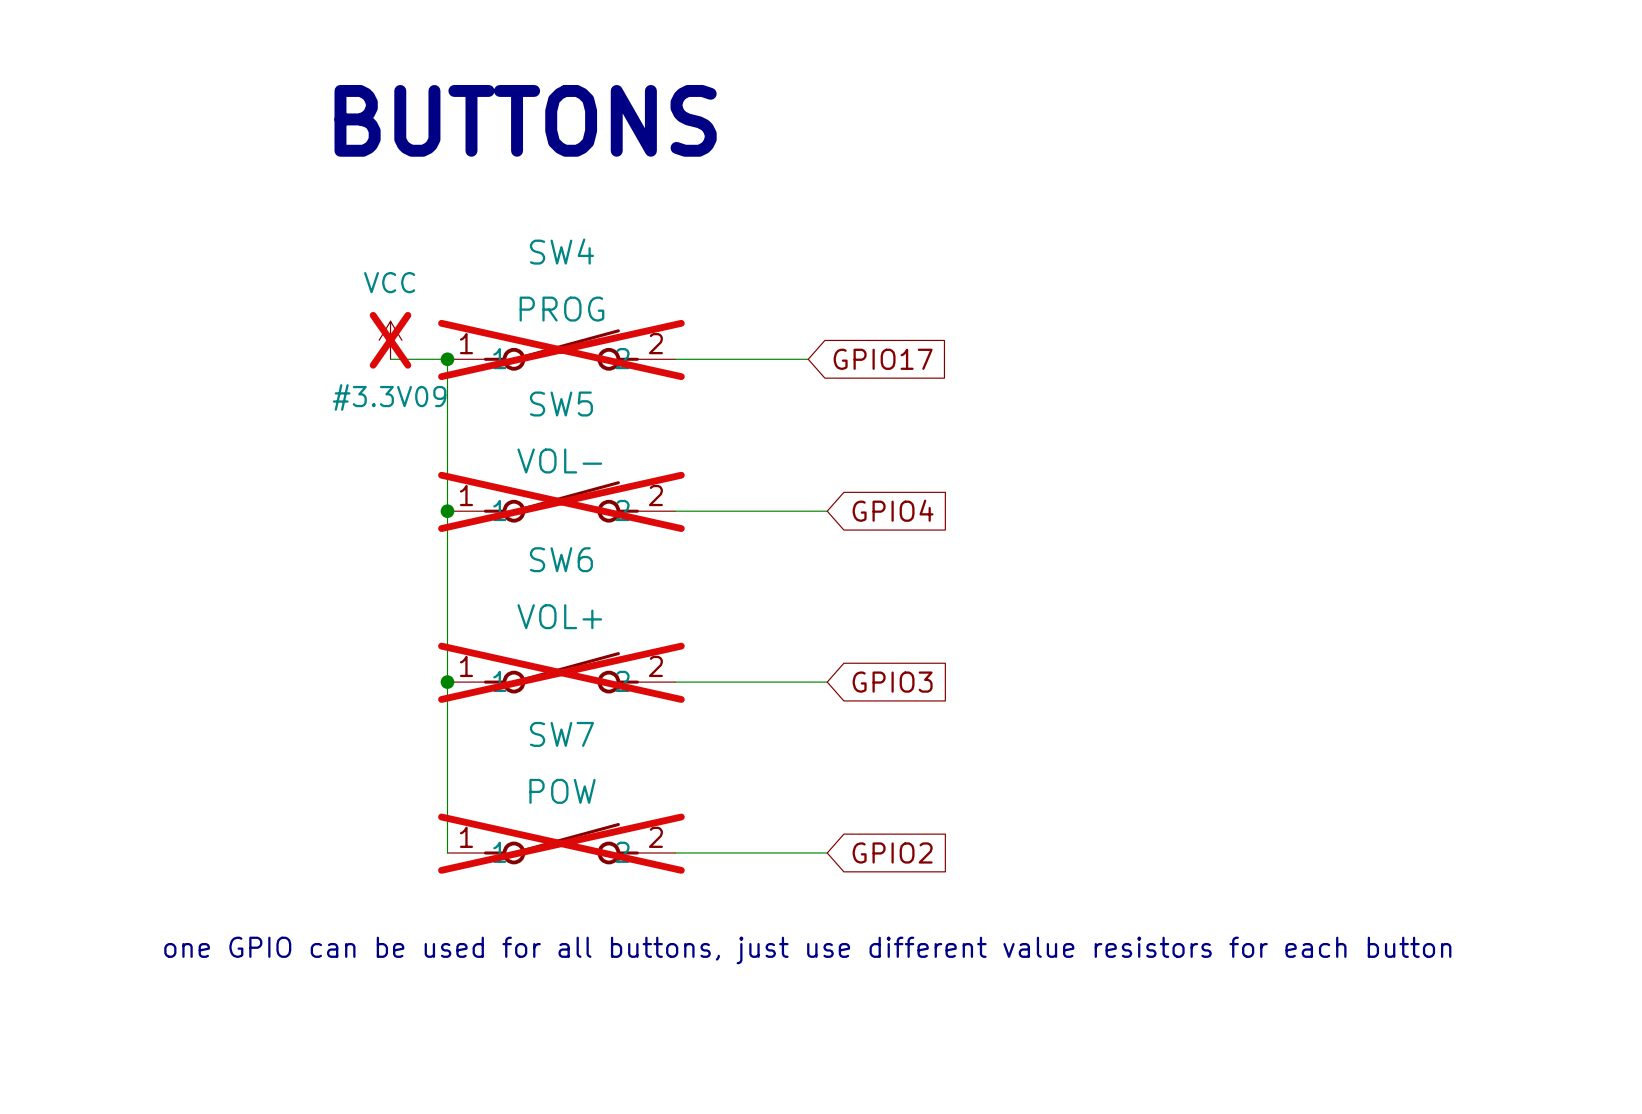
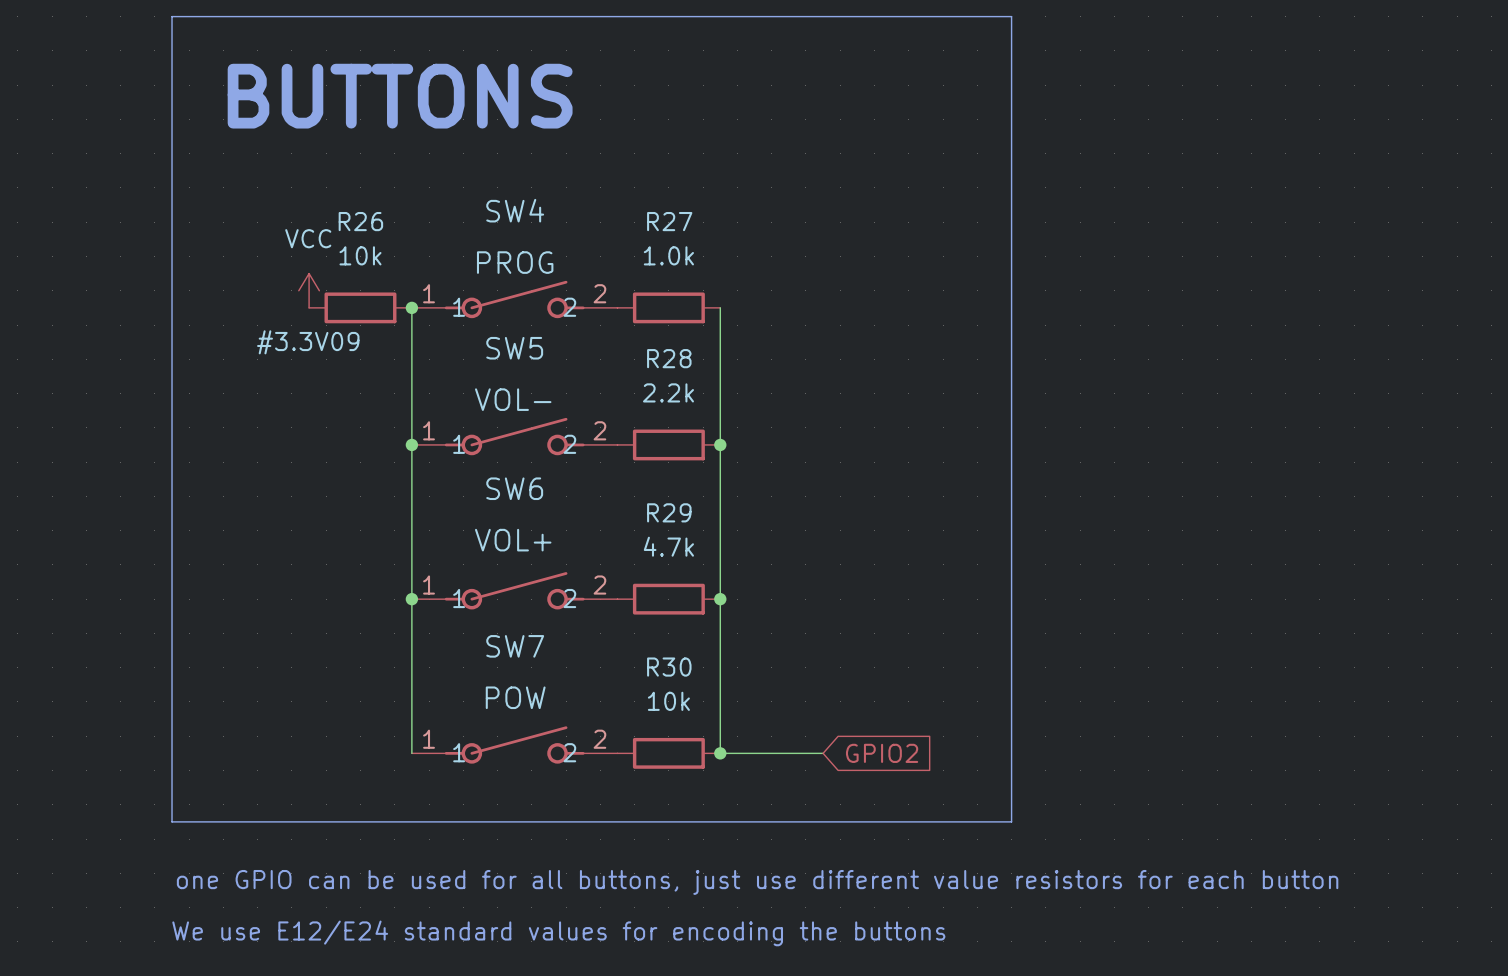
line: none -> (172, 16) (1011, 16) (1011, 821) (172, 821) (172, 16)
text position: BUTTONS (525, 120) -> BUTTONS (400, 96)
#3.3V09 position: VCC (390, 340) -> VCC (309, 290)
#3.3V09 do-not-place cross: (390, 340) -> none
SW4 do-not-place cross: (561, 349) -> none
wire: (390, 359) (447, 359) -> none
R26: none -> 10k (360, 307)
wire: (675, 359) (808, 359) -> none
R27: none -> 1.0k (668, 307)
global label: GPIO17 (883, 359) -> none
SW5 do-not-place cross: (561, 501) -> none
global label: GPIO4 (893, 510) -> none
wire: (675, 511) (827, 511) -> none
R28: none -> 2.2k (668, 444)
junction: none -> (720, 444)
SW6 do-not-place cross: (561, 672) -> none
wire: (675, 682) (827, 682) -> none
R29: none -> 4.7k (668, 599)
junction: none -> (720, 599)
global label: GPIO3 (892, 682) -> none
SW7 do-not-place cross: (561, 843) -> none
wire: (675, 852) (789, 852) -> (720, 307) (720, 753)
R30: none -> 10k (668, 753)
junction: none -> (720, 753)
wire: none -> (754, 753) (823, 753)
global label position: GPIO2 (892, 852) -> GPIO2 (882, 753)
text position: one GPIO can be used for all buttons, just use different value resistors for each button (807, 950) -> one GPIO can be used for all buttons, just use different value resistors for each button (757, 882)
text: none -> We use E12/E24 standard values for encoding the buttons (558, 933)

